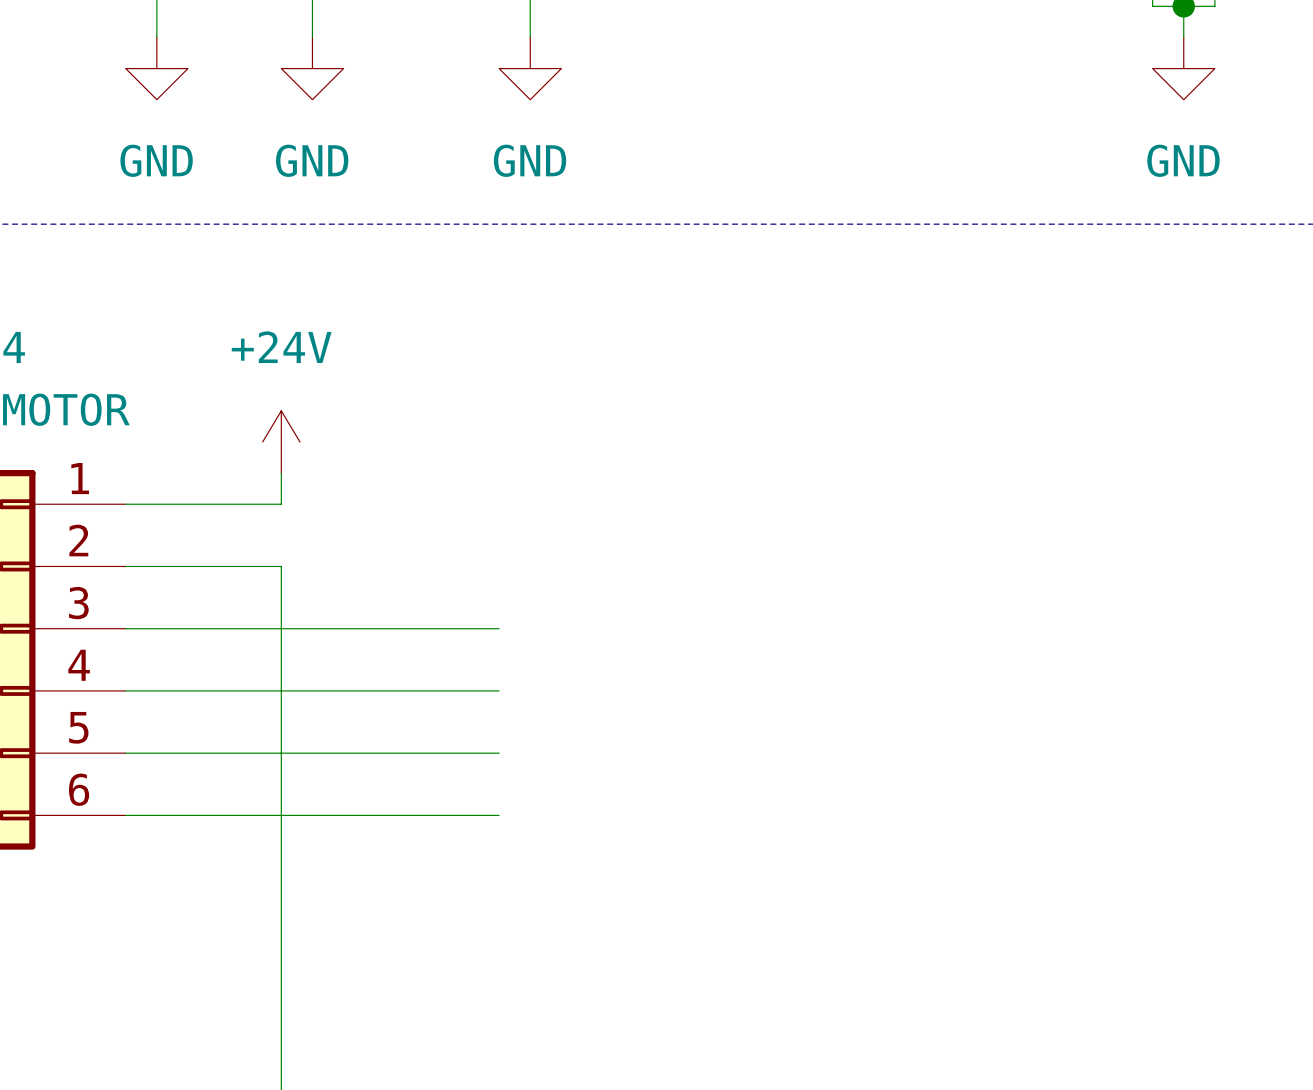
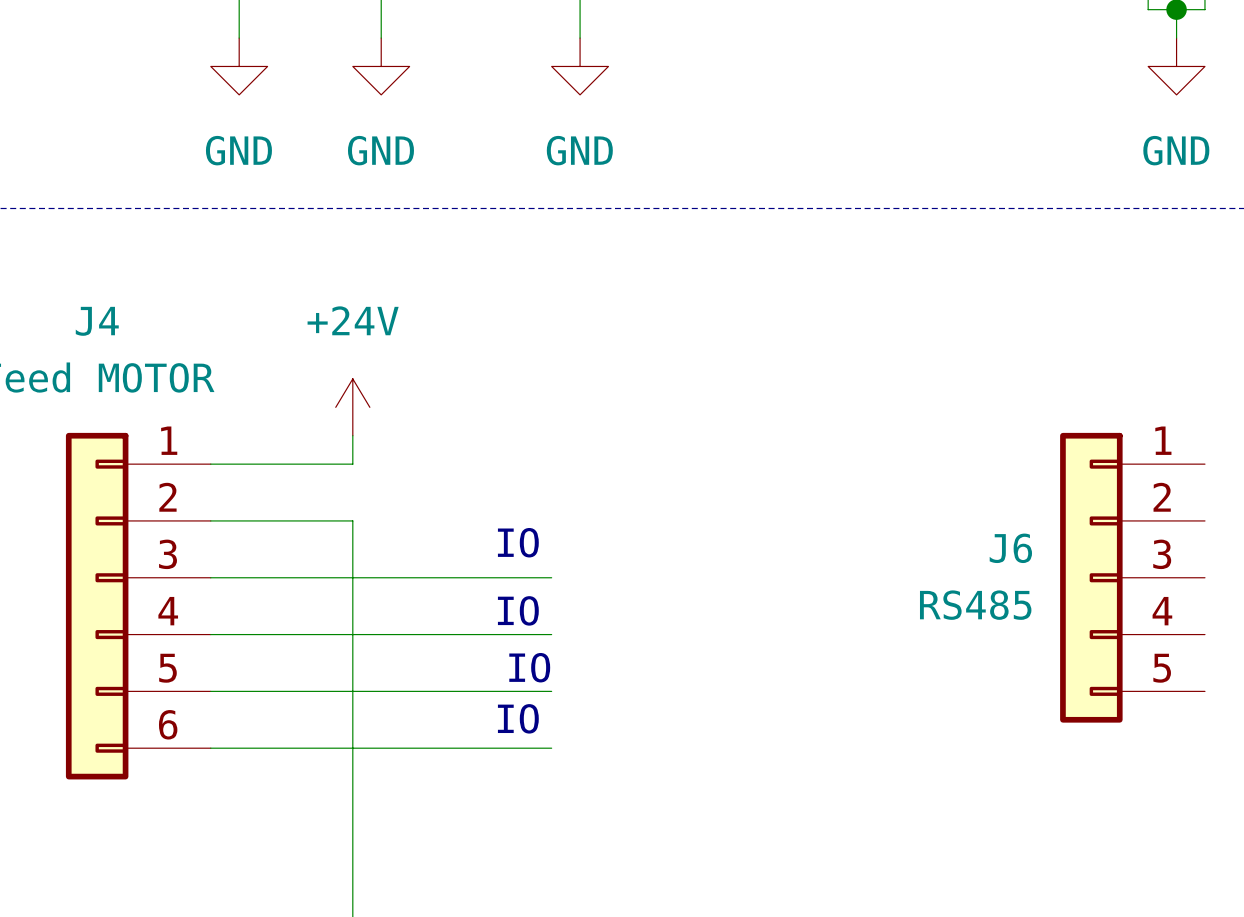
text: none -> IO (518, 542)
J6: none -> RS485 (1132, 577)
text: none -> IO (518, 610)
text: none -> IO (529, 667)
text: none -> IO (518, 718)

